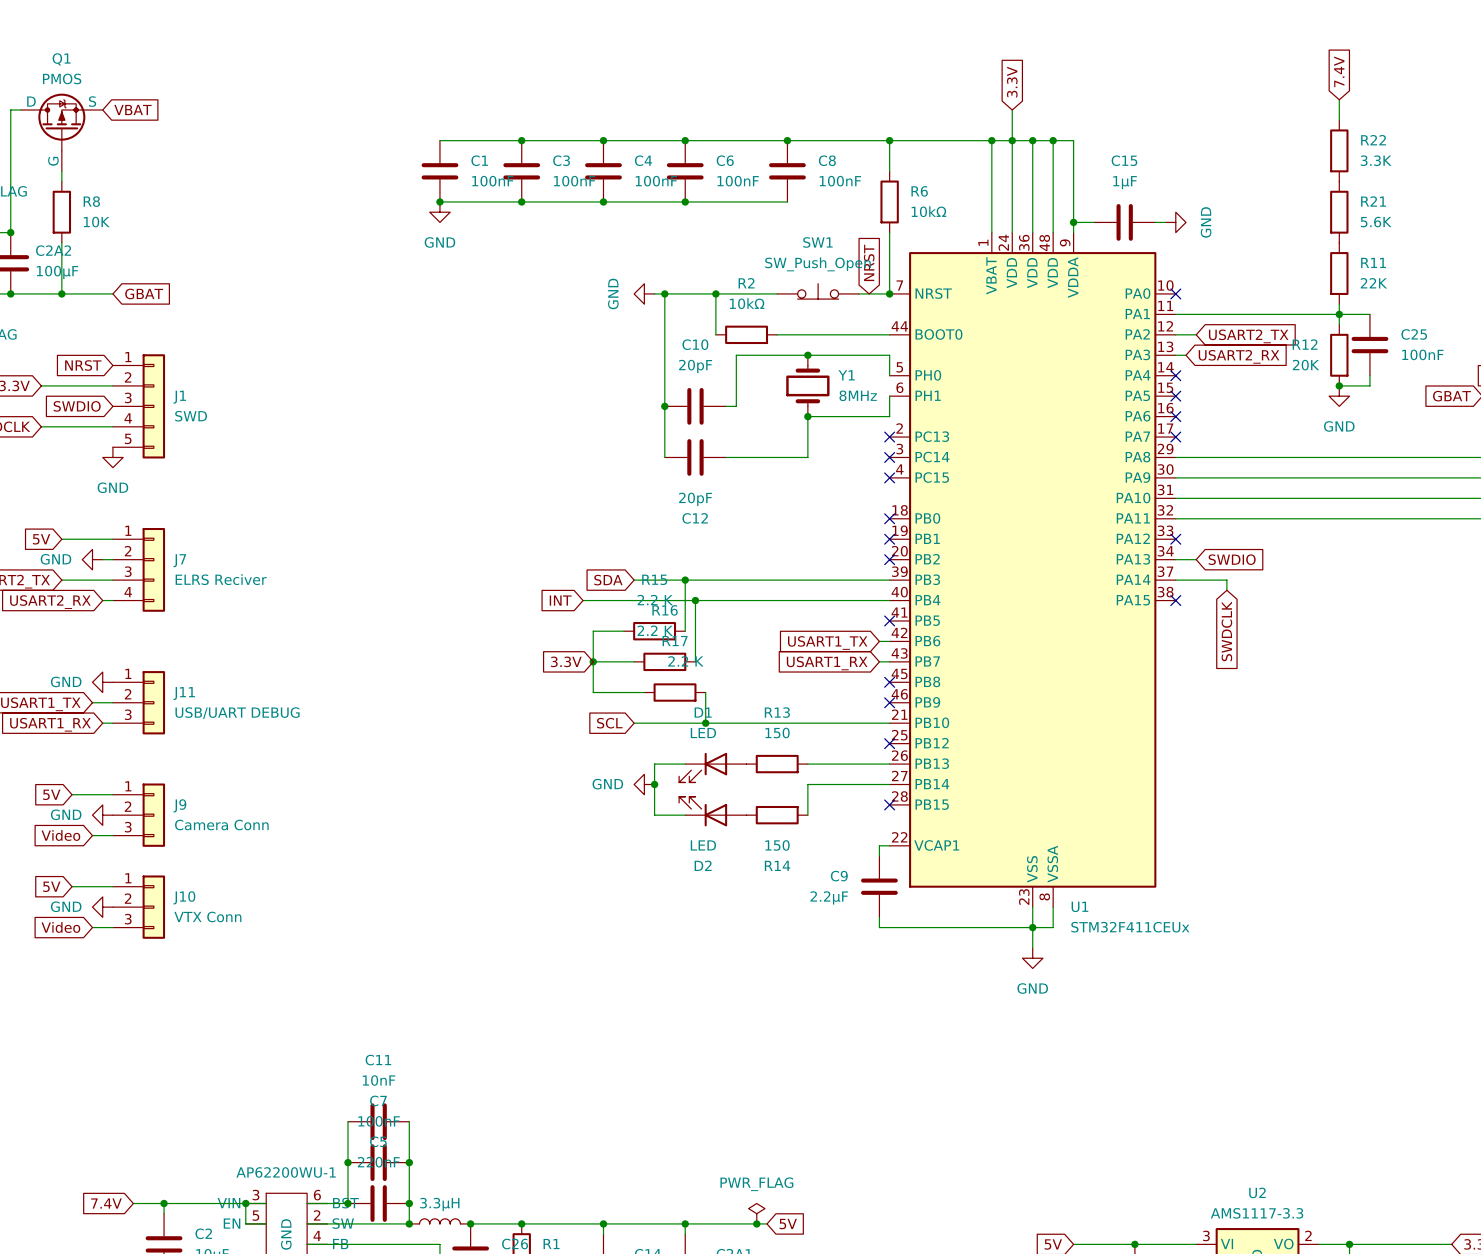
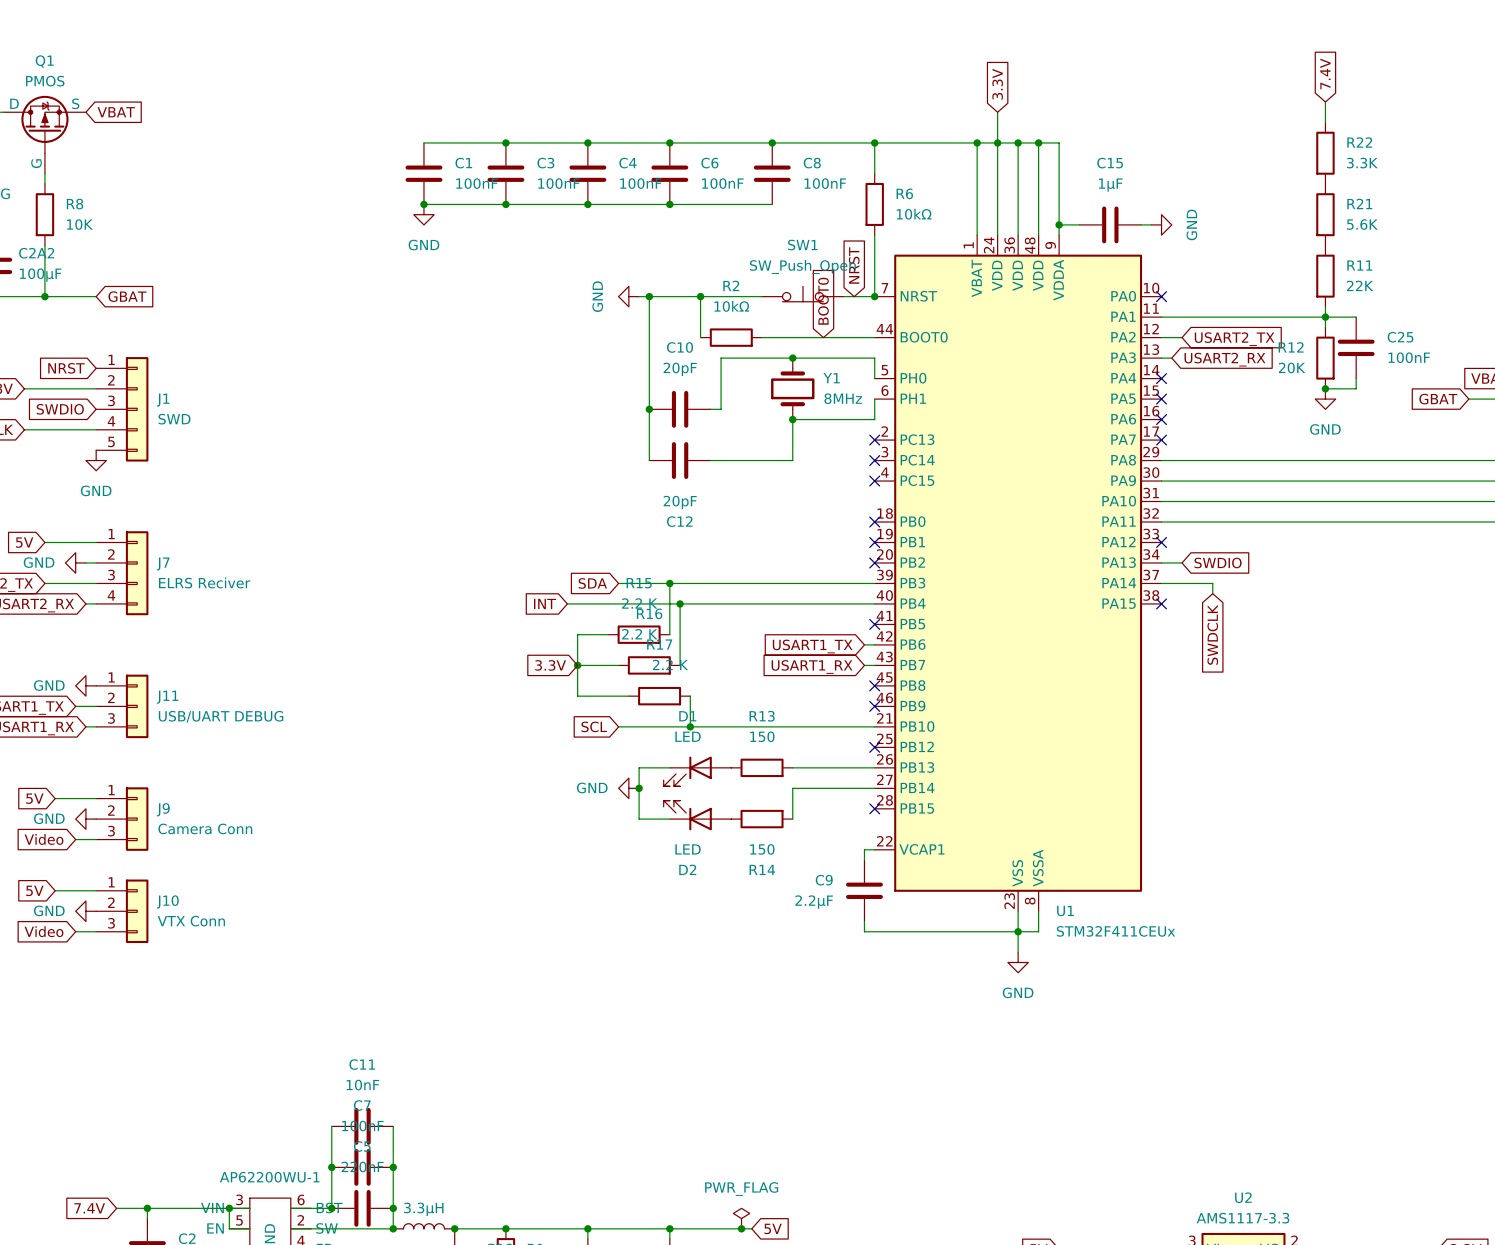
global label: none -> BOOT0 (823, 301)

